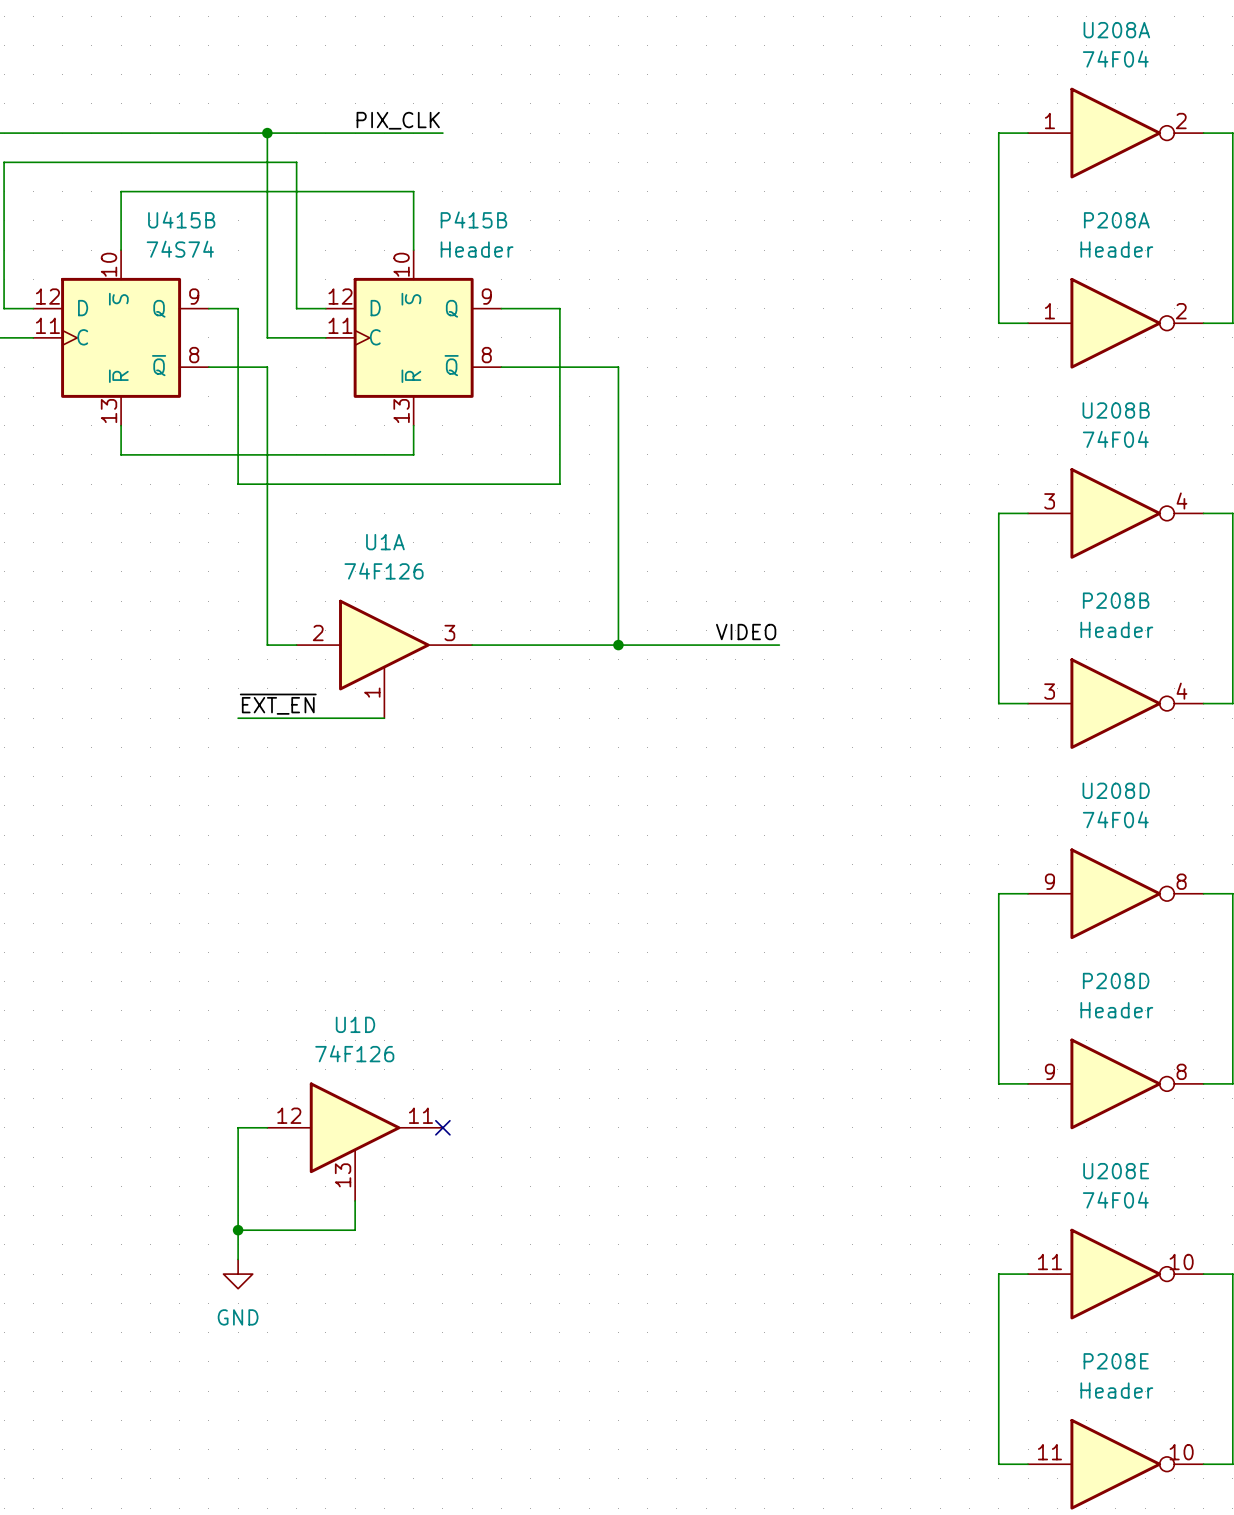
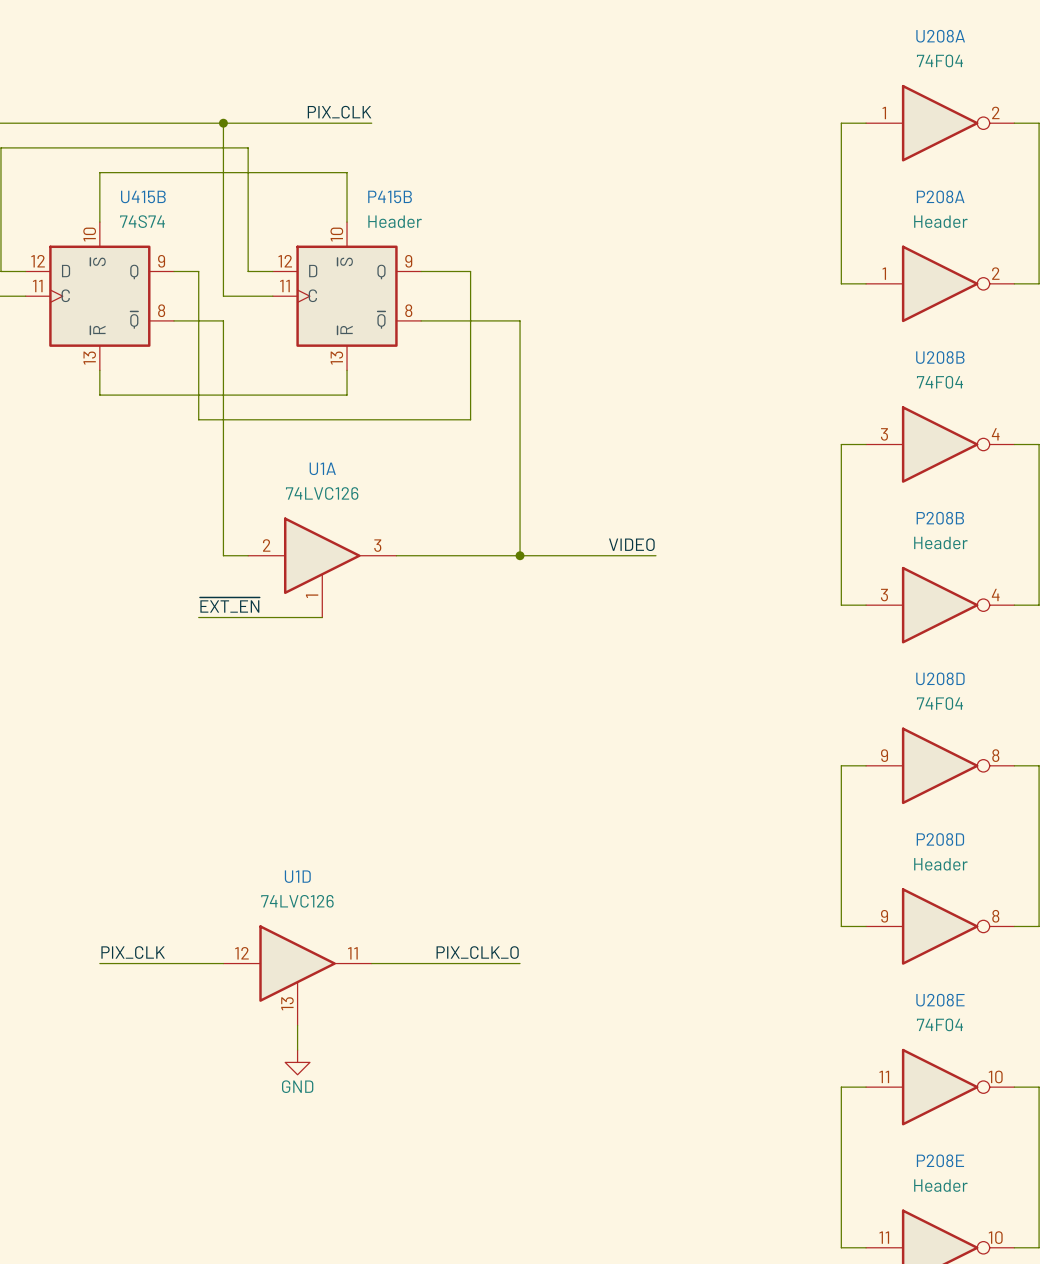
U1A value: 74F126 (384, 571) -> 74LVC126 (322, 493)
U1D value: 74F126 (354, 1053) -> 74LVC126 (297, 901)
label: none -> PIX_CLK (133, 952)
label: none -> PIX_CLK_O (477, 952)
wire: (238, 1127) (238, 1259) -> (198, 963) (99, 963)
wire: none -> (371, 963) (520, 963)
no-connect mark: (442, 1127) -> none
wire: (238, 1230) (355, 1230) -> none
junction: (238, 1230) -> none
power symbol position: GND (238, 1274) -> GND (297, 1062)
power symbol text position: GND (238, 1317) -> GND (297, 1086)

